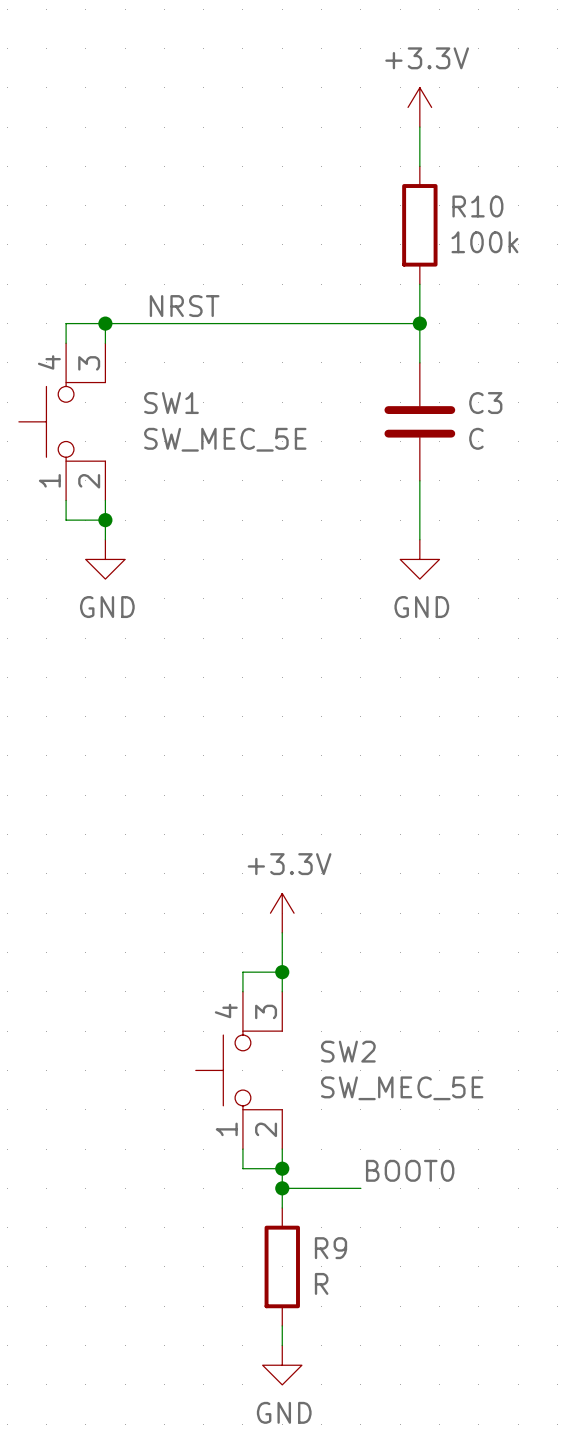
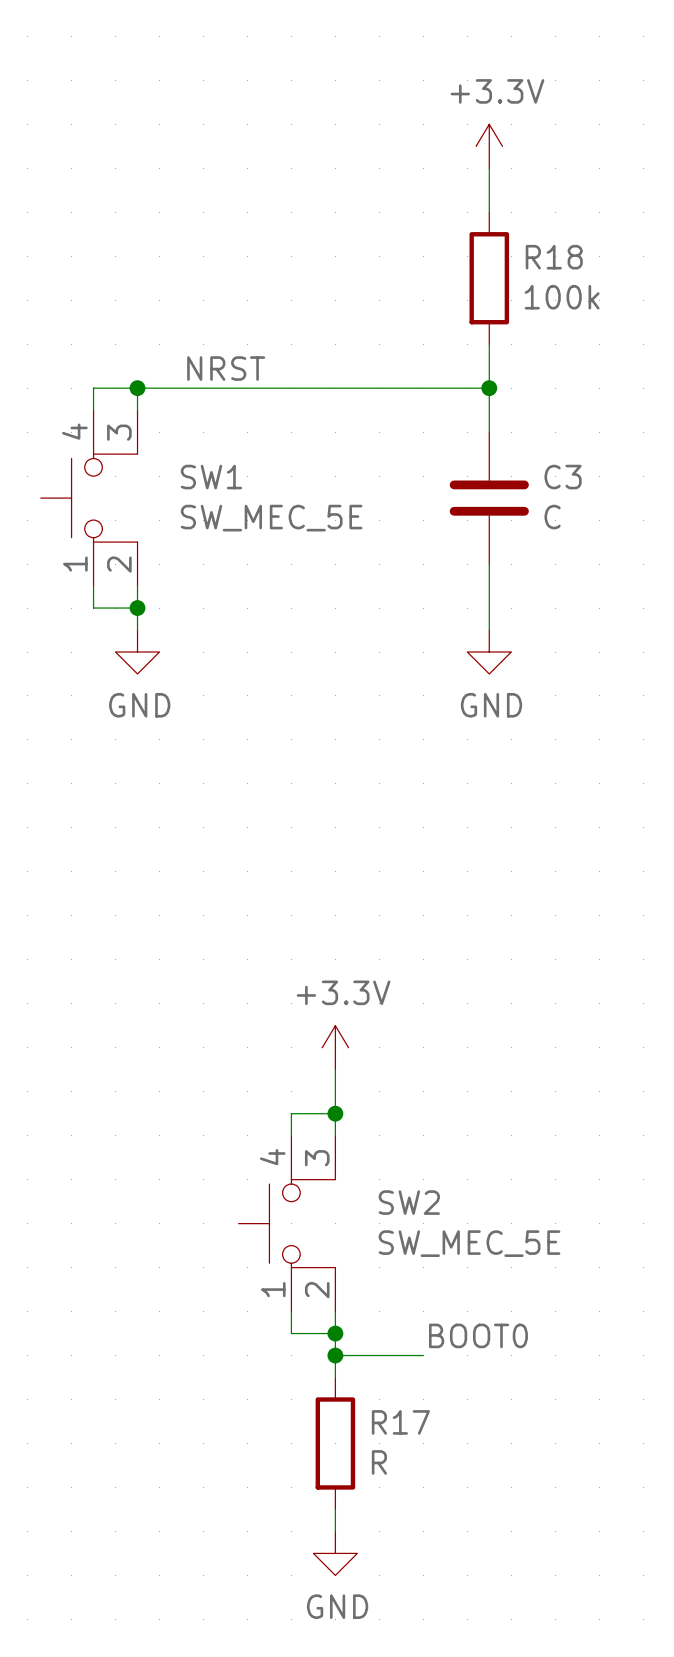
R10 name: R10 (477, 206) -> R18 (554, 257)
R9 name: R9 (330, 1248) -> R17 (400, 1422)

